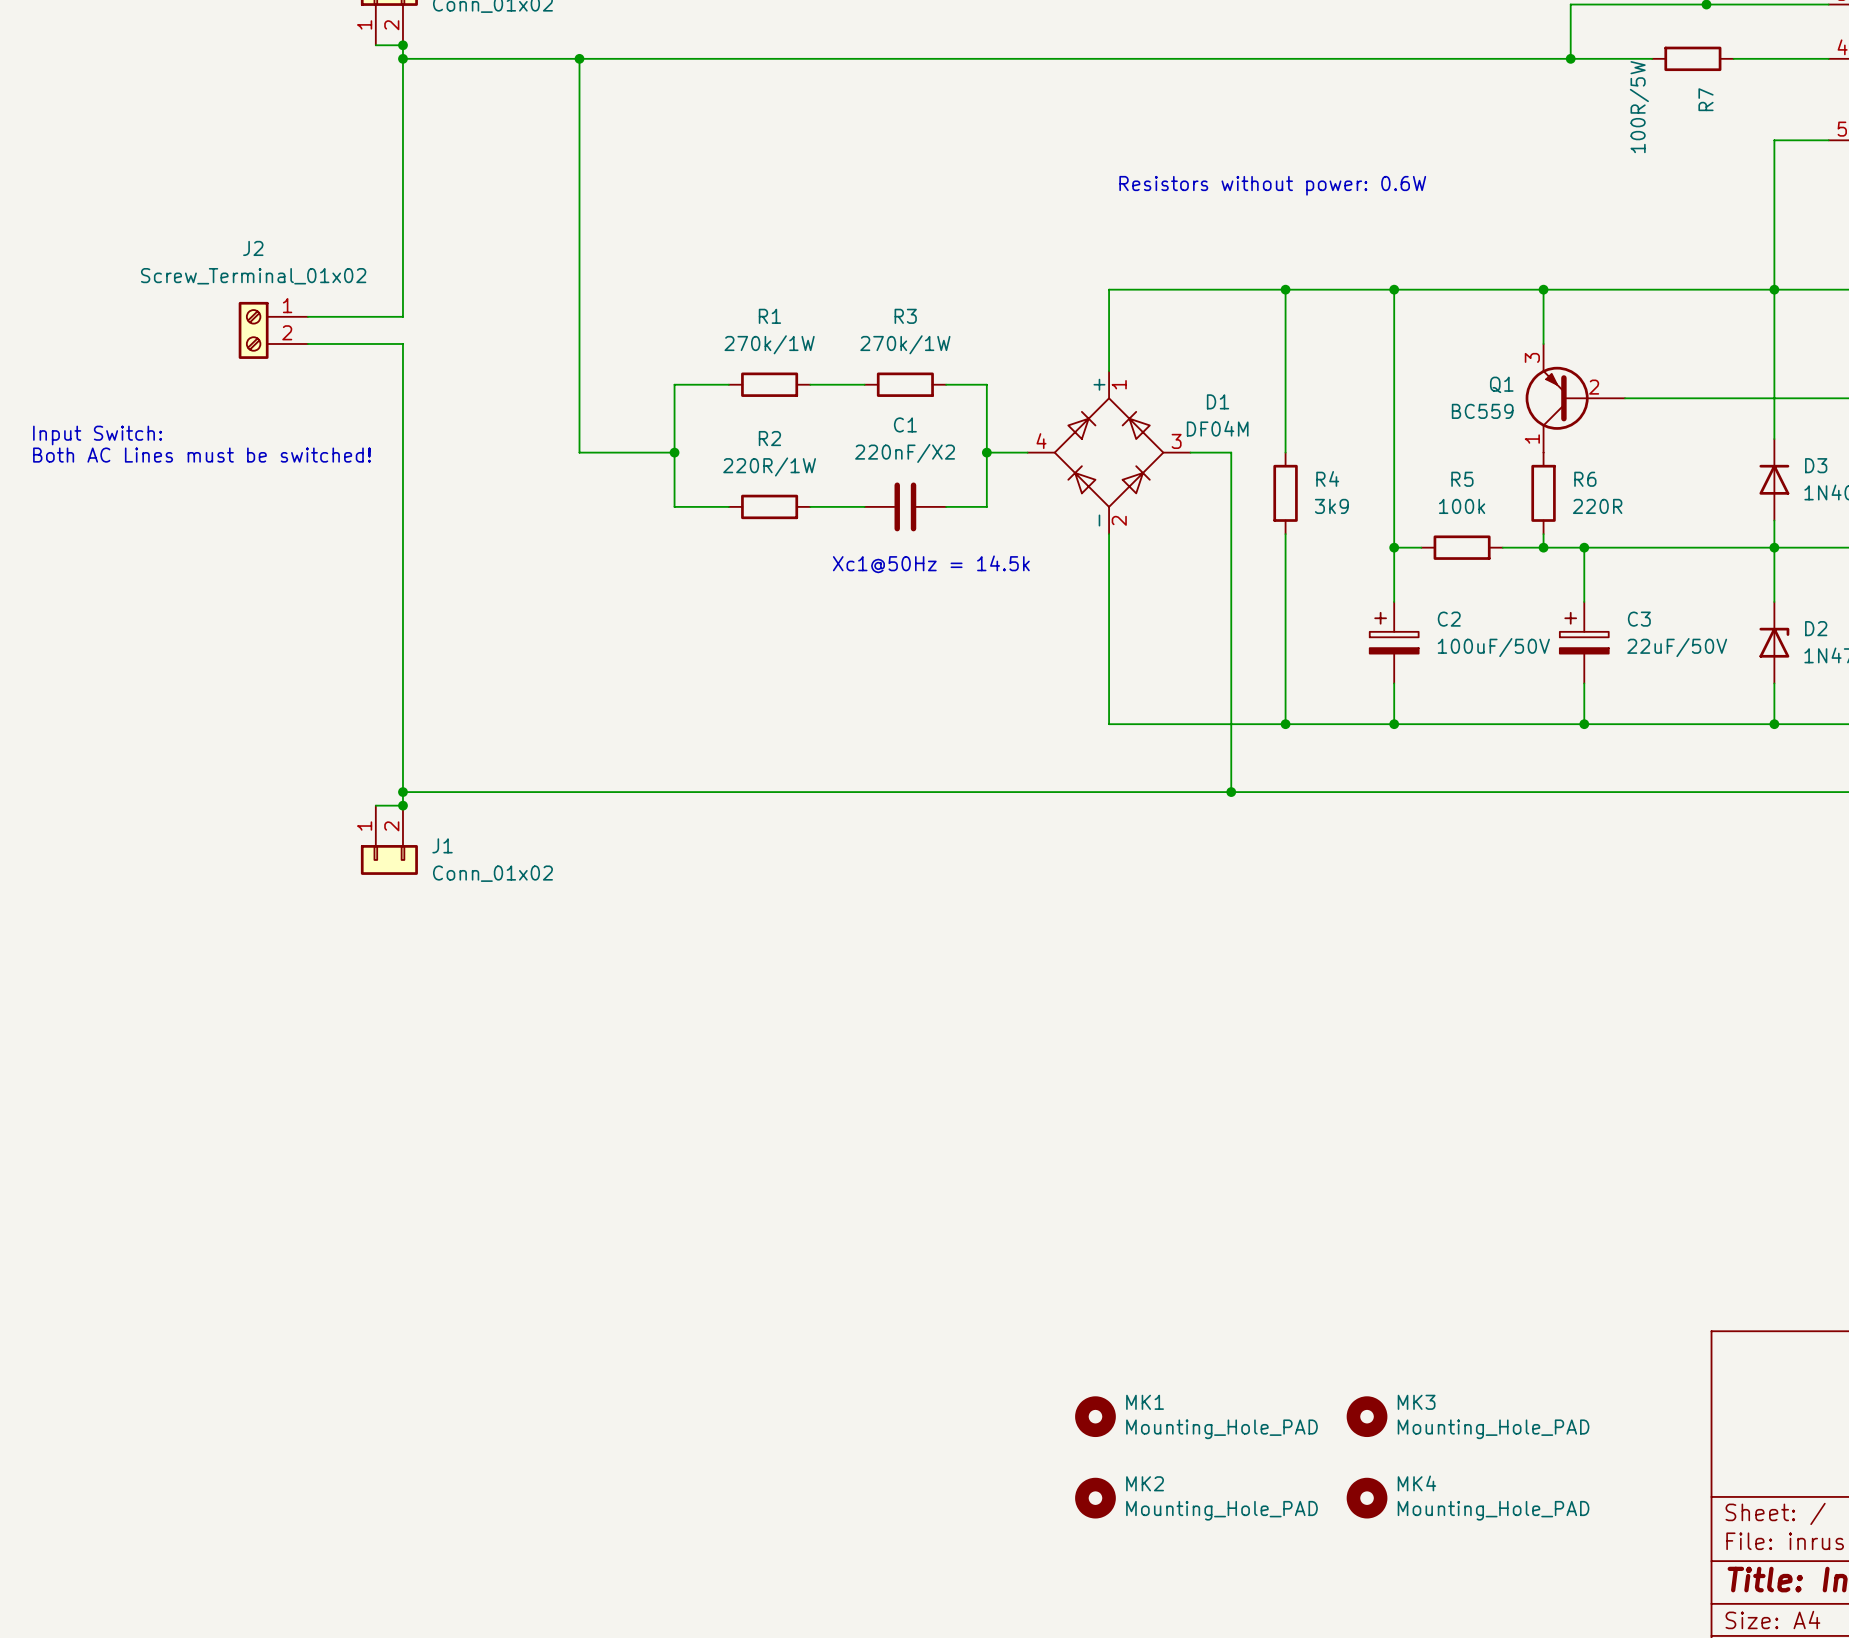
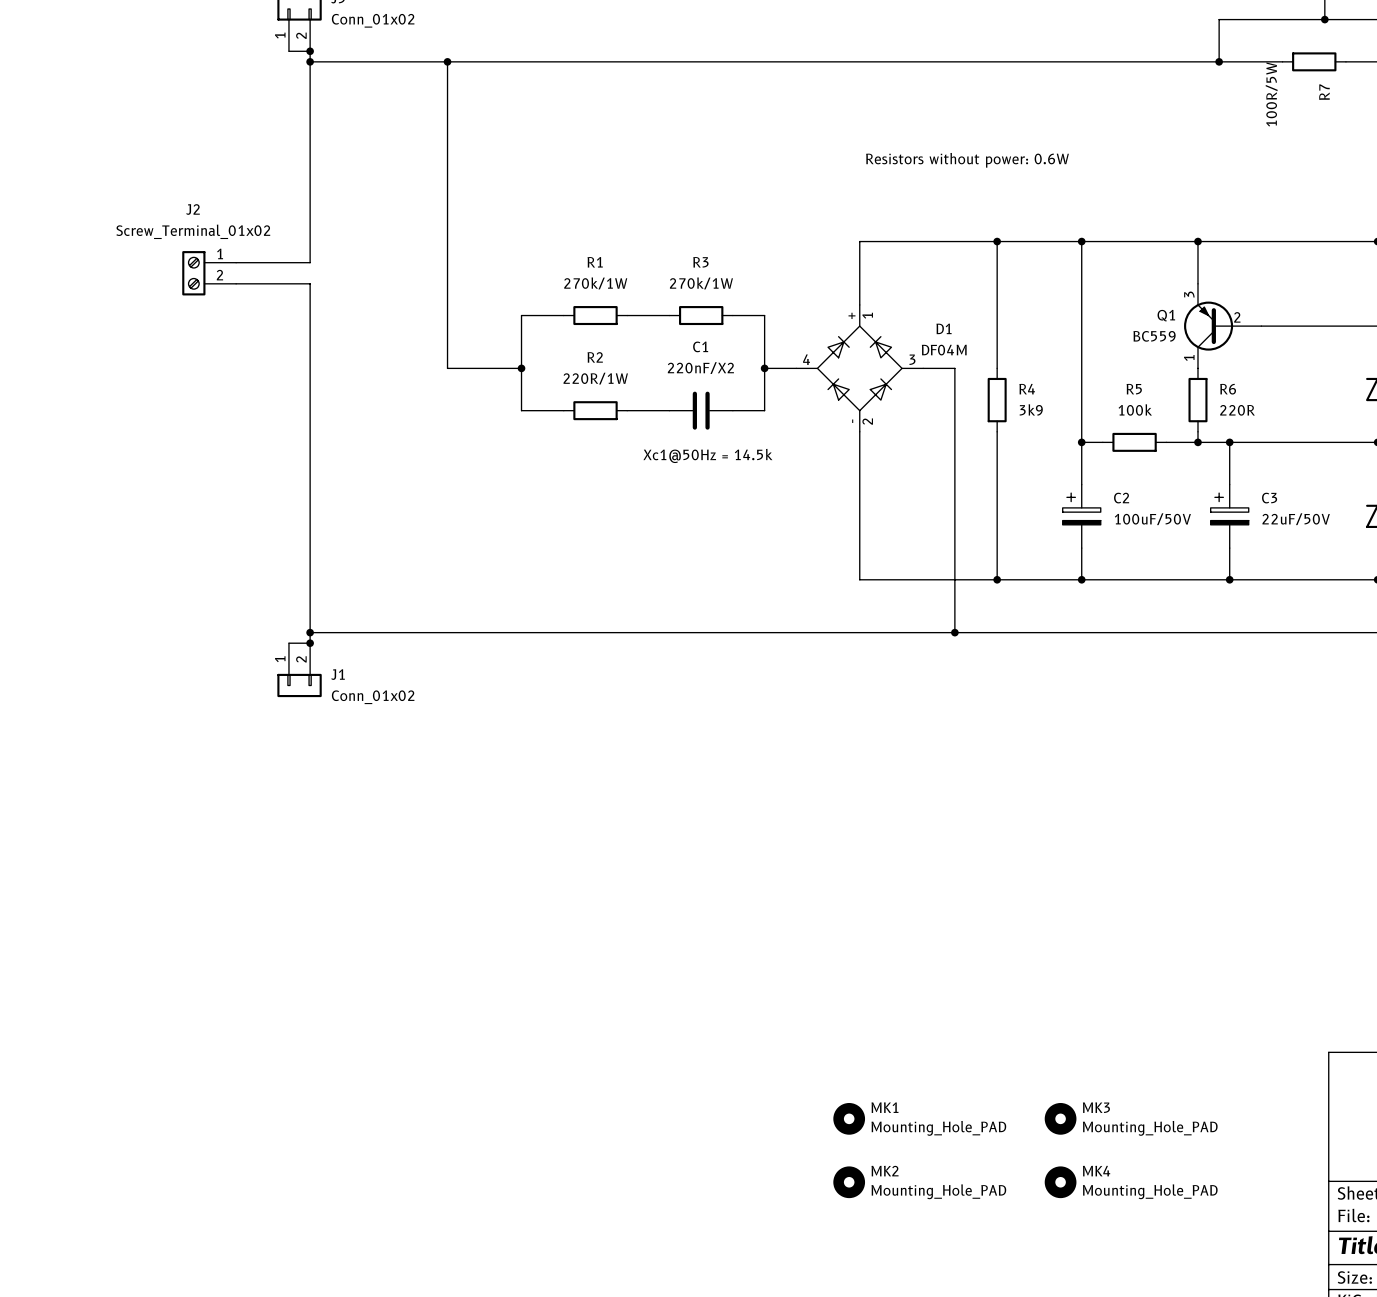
text: Input Switch: (97, 435) -> none
text: Both AC Lines must be switched! (202, 455) -> none

